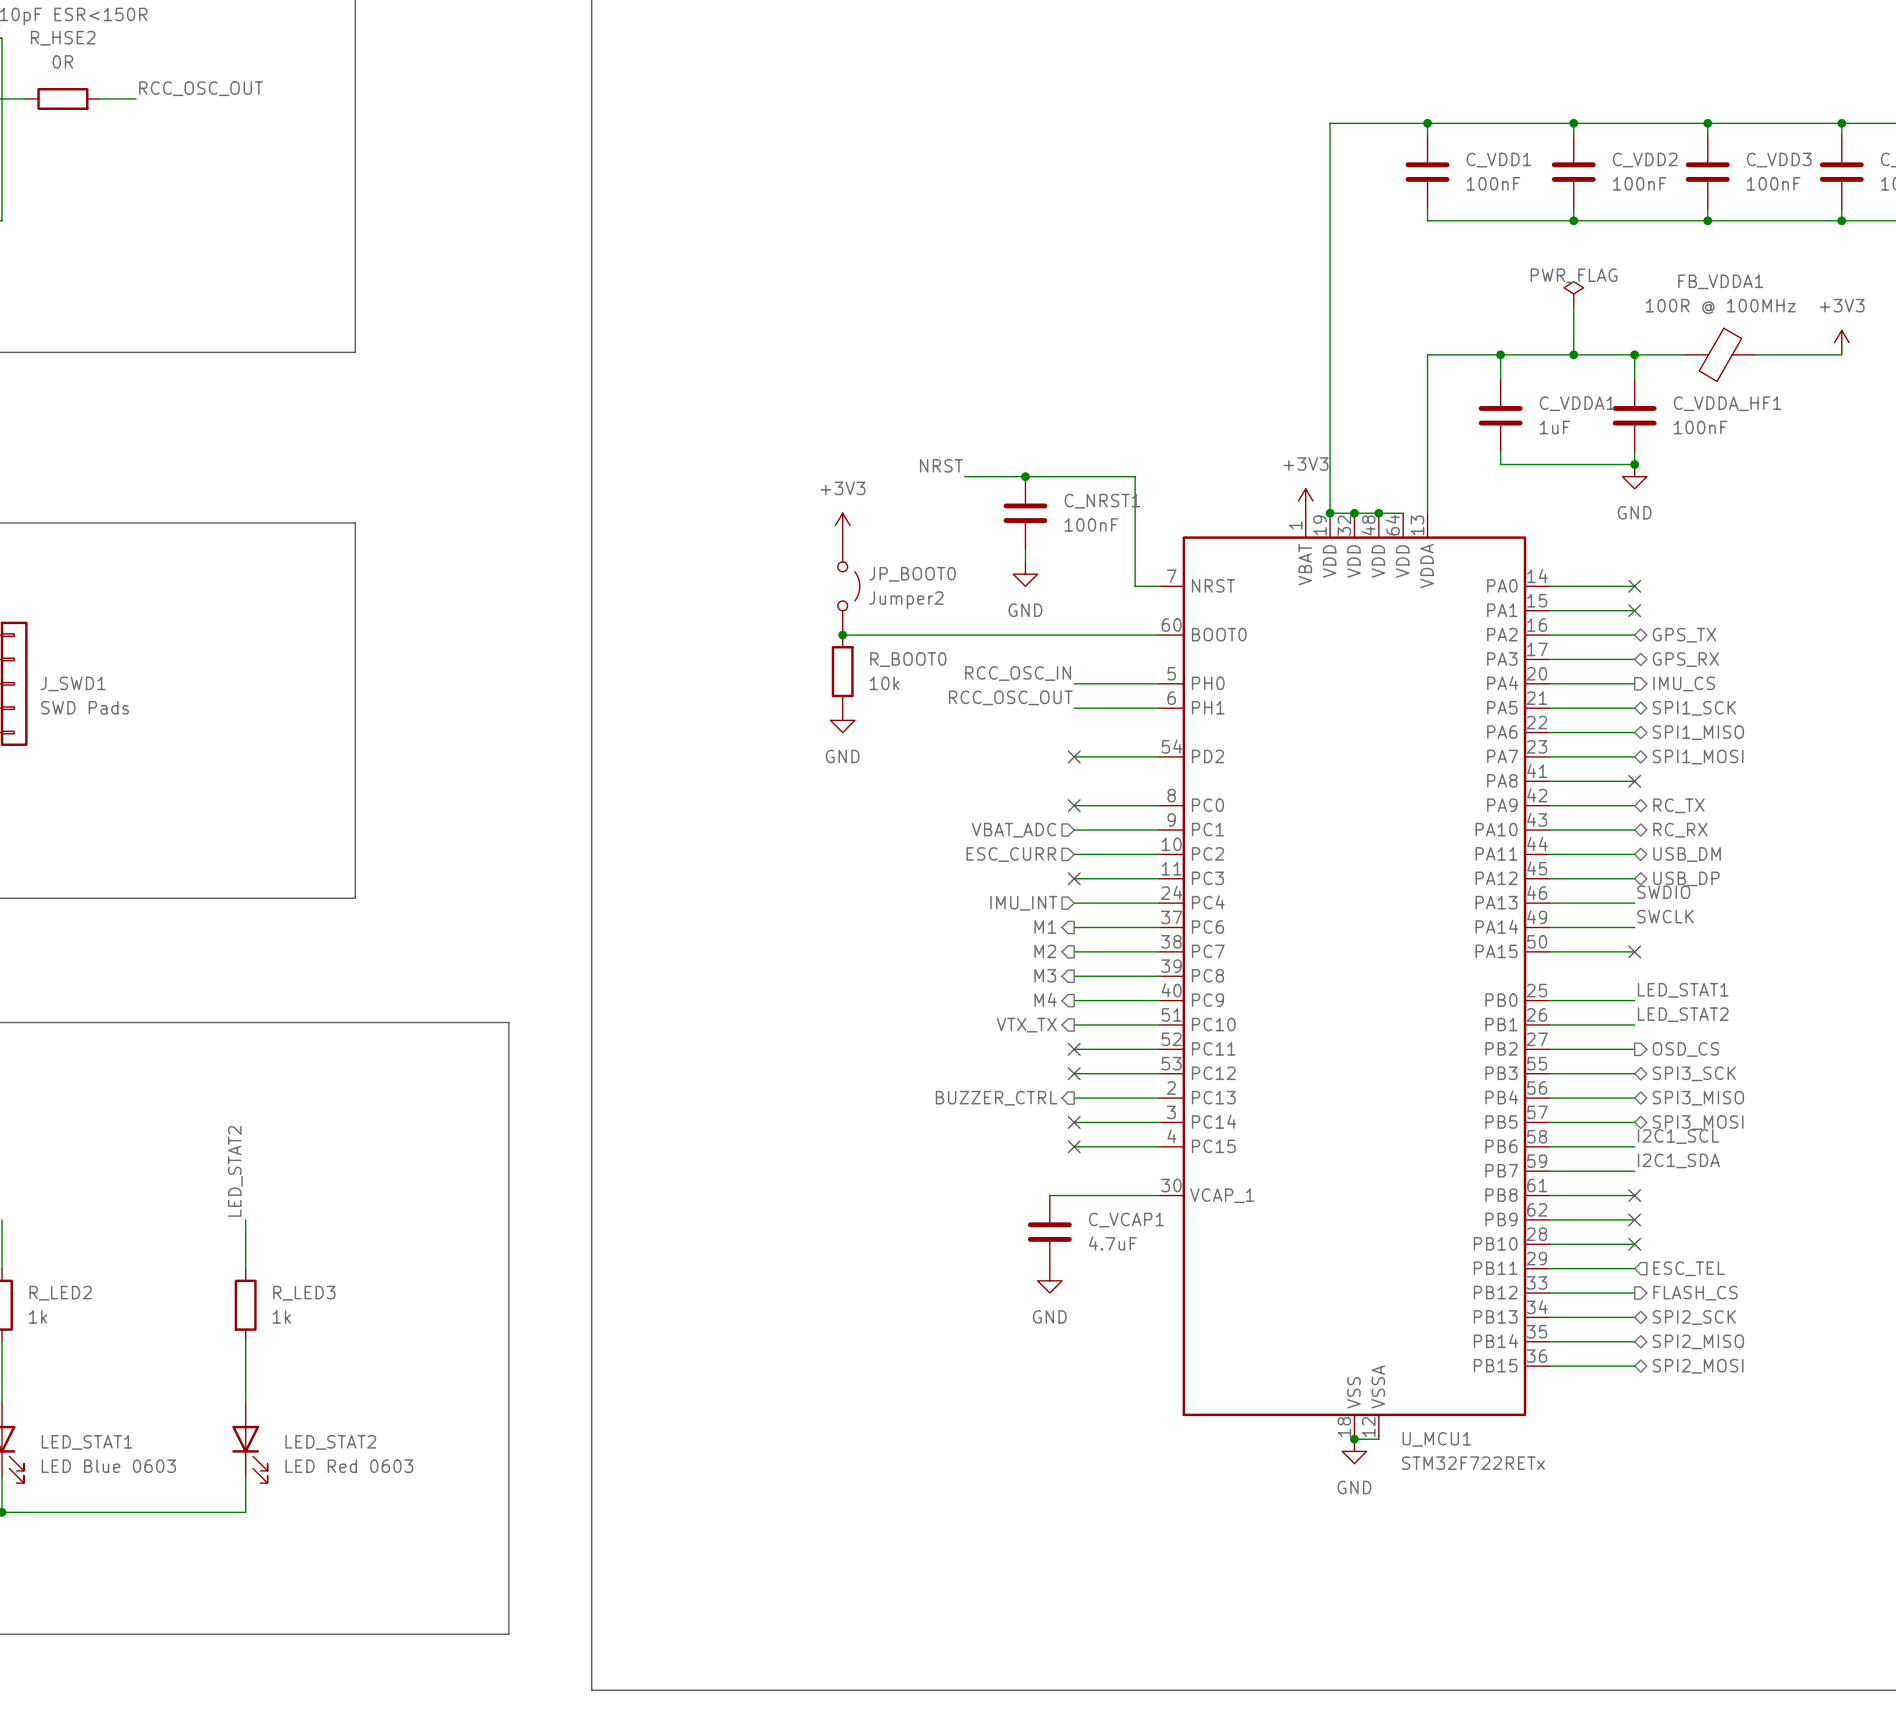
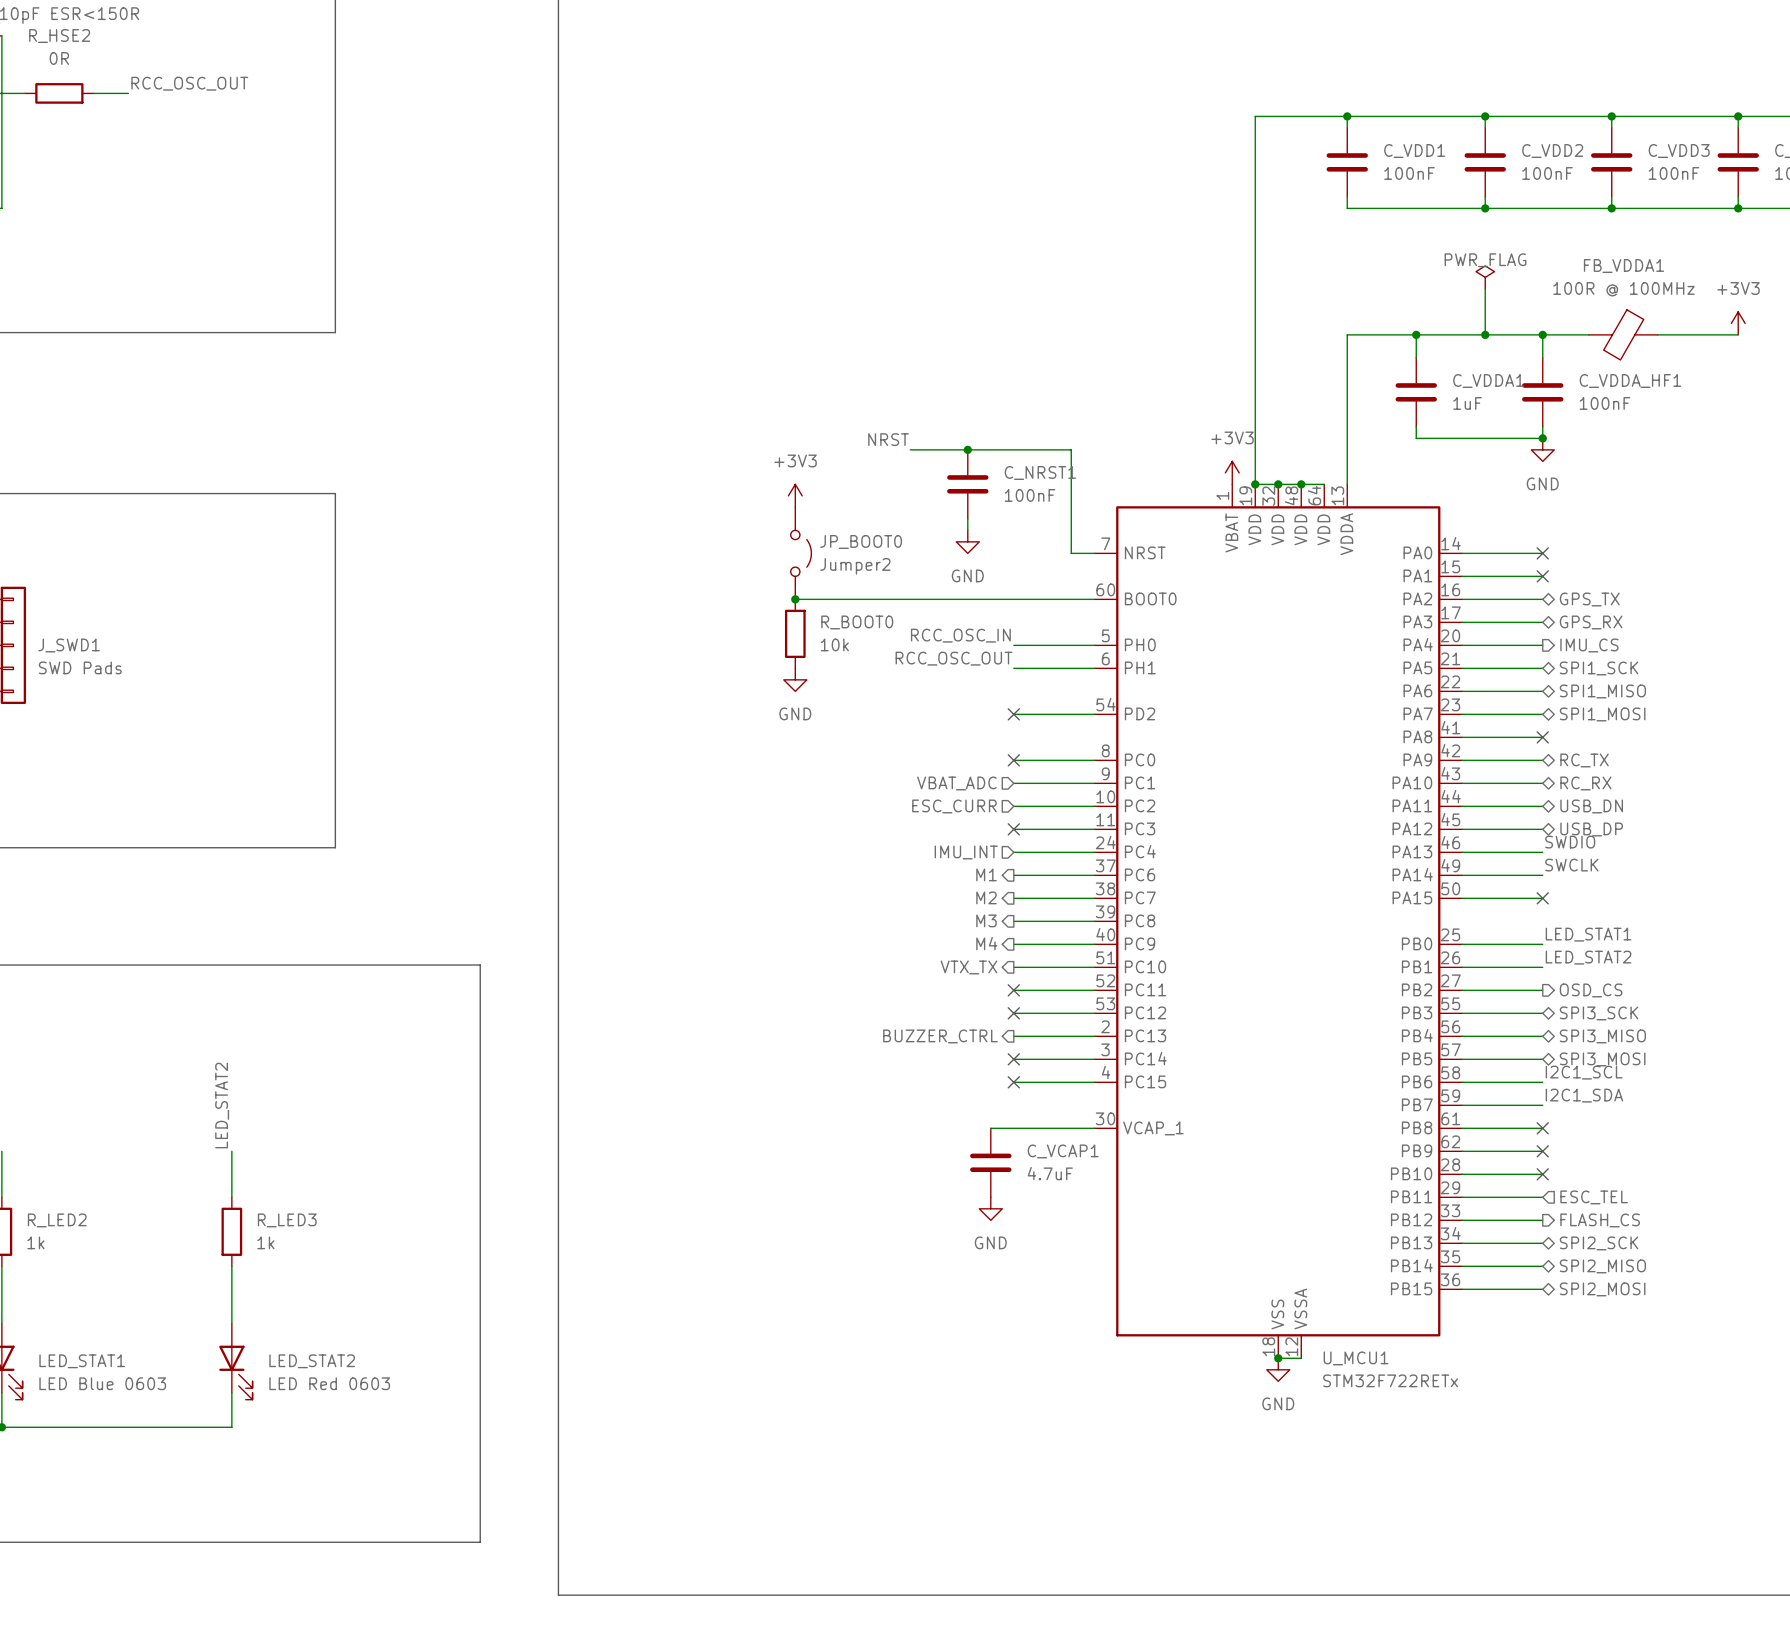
hierarchical label: USB_DM (1687, 854) -> USB_DN (1591, 806)

